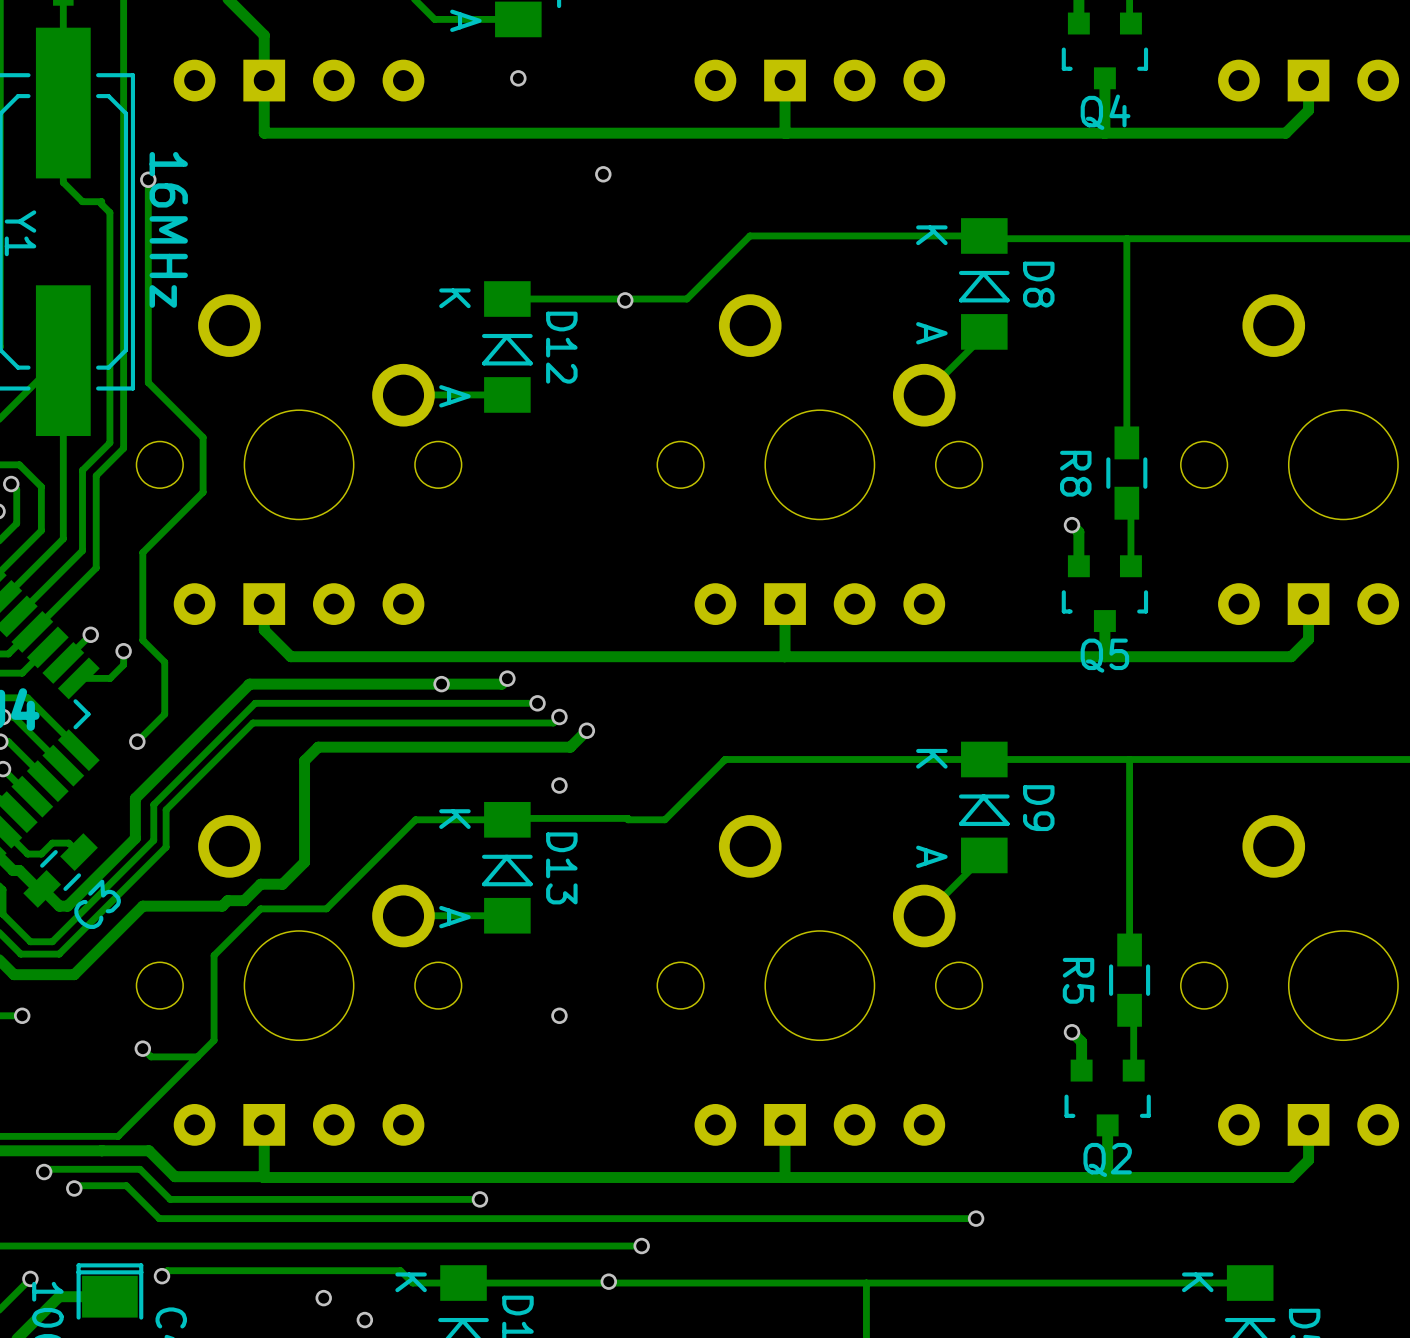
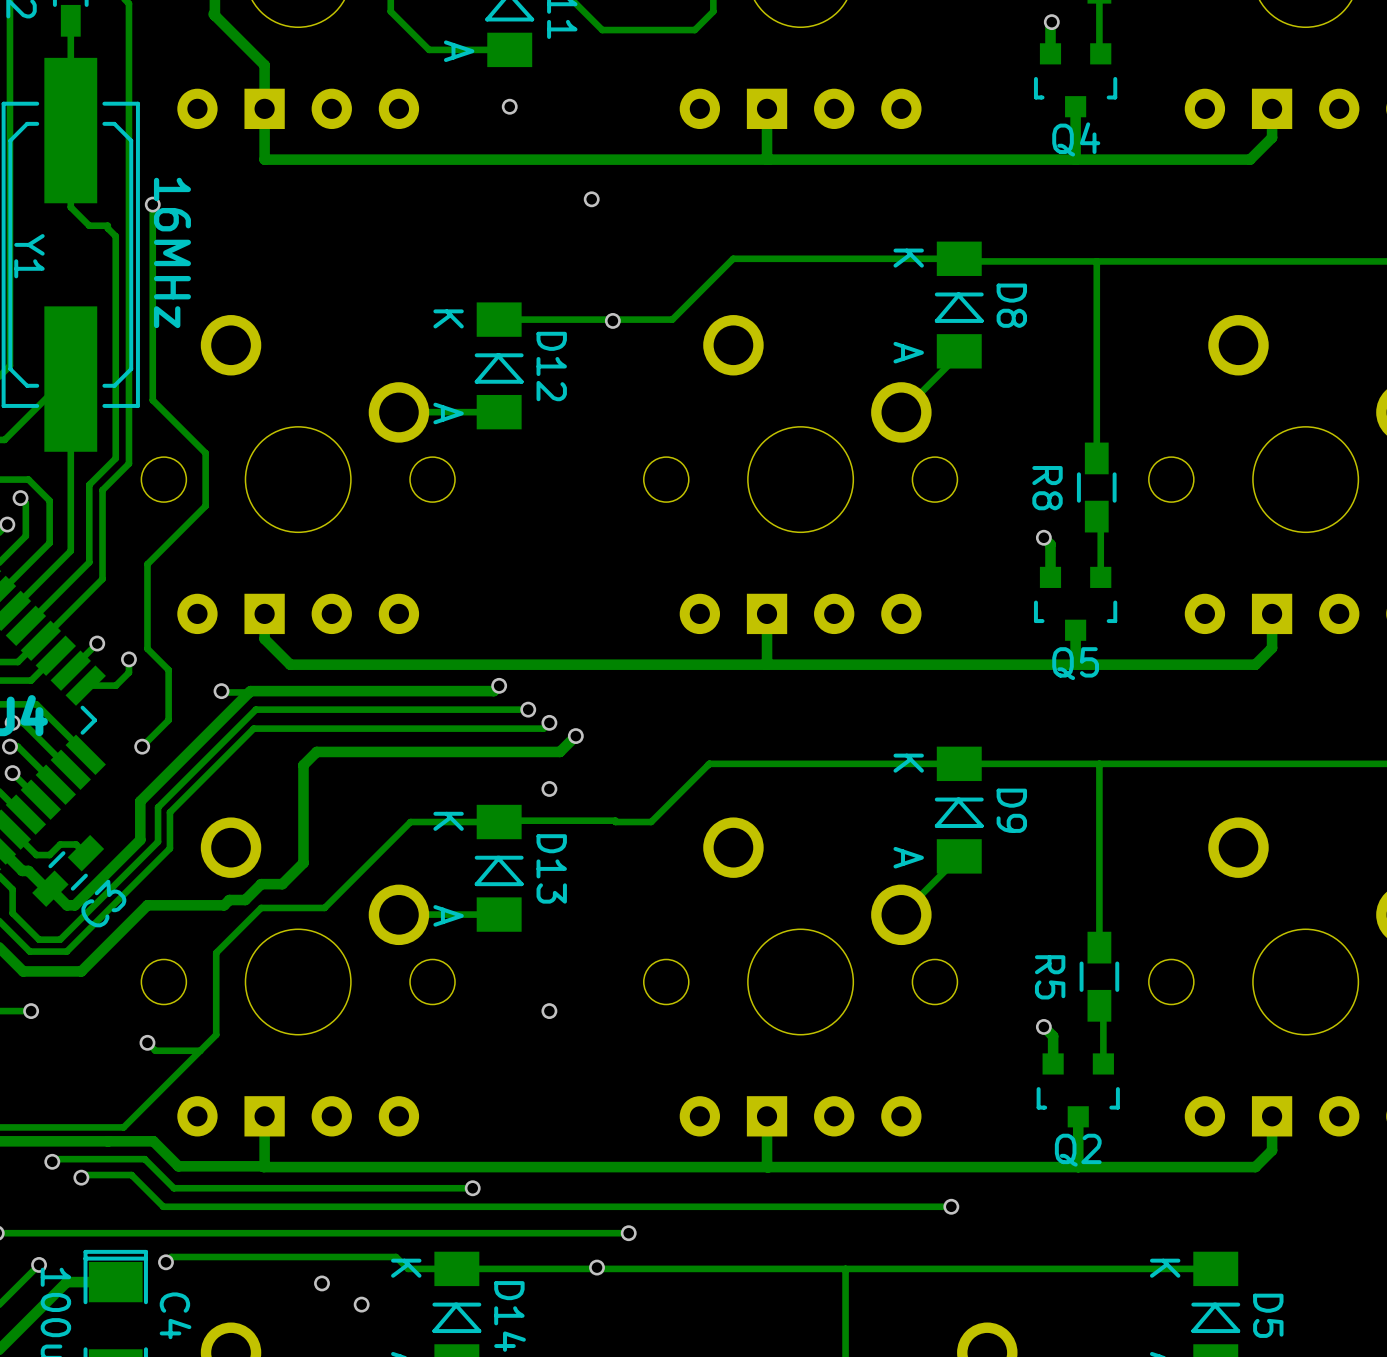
track: none -> (221, 691) (249, 692)
via: none -> (221, 691)
via: (441, 684) -> none

